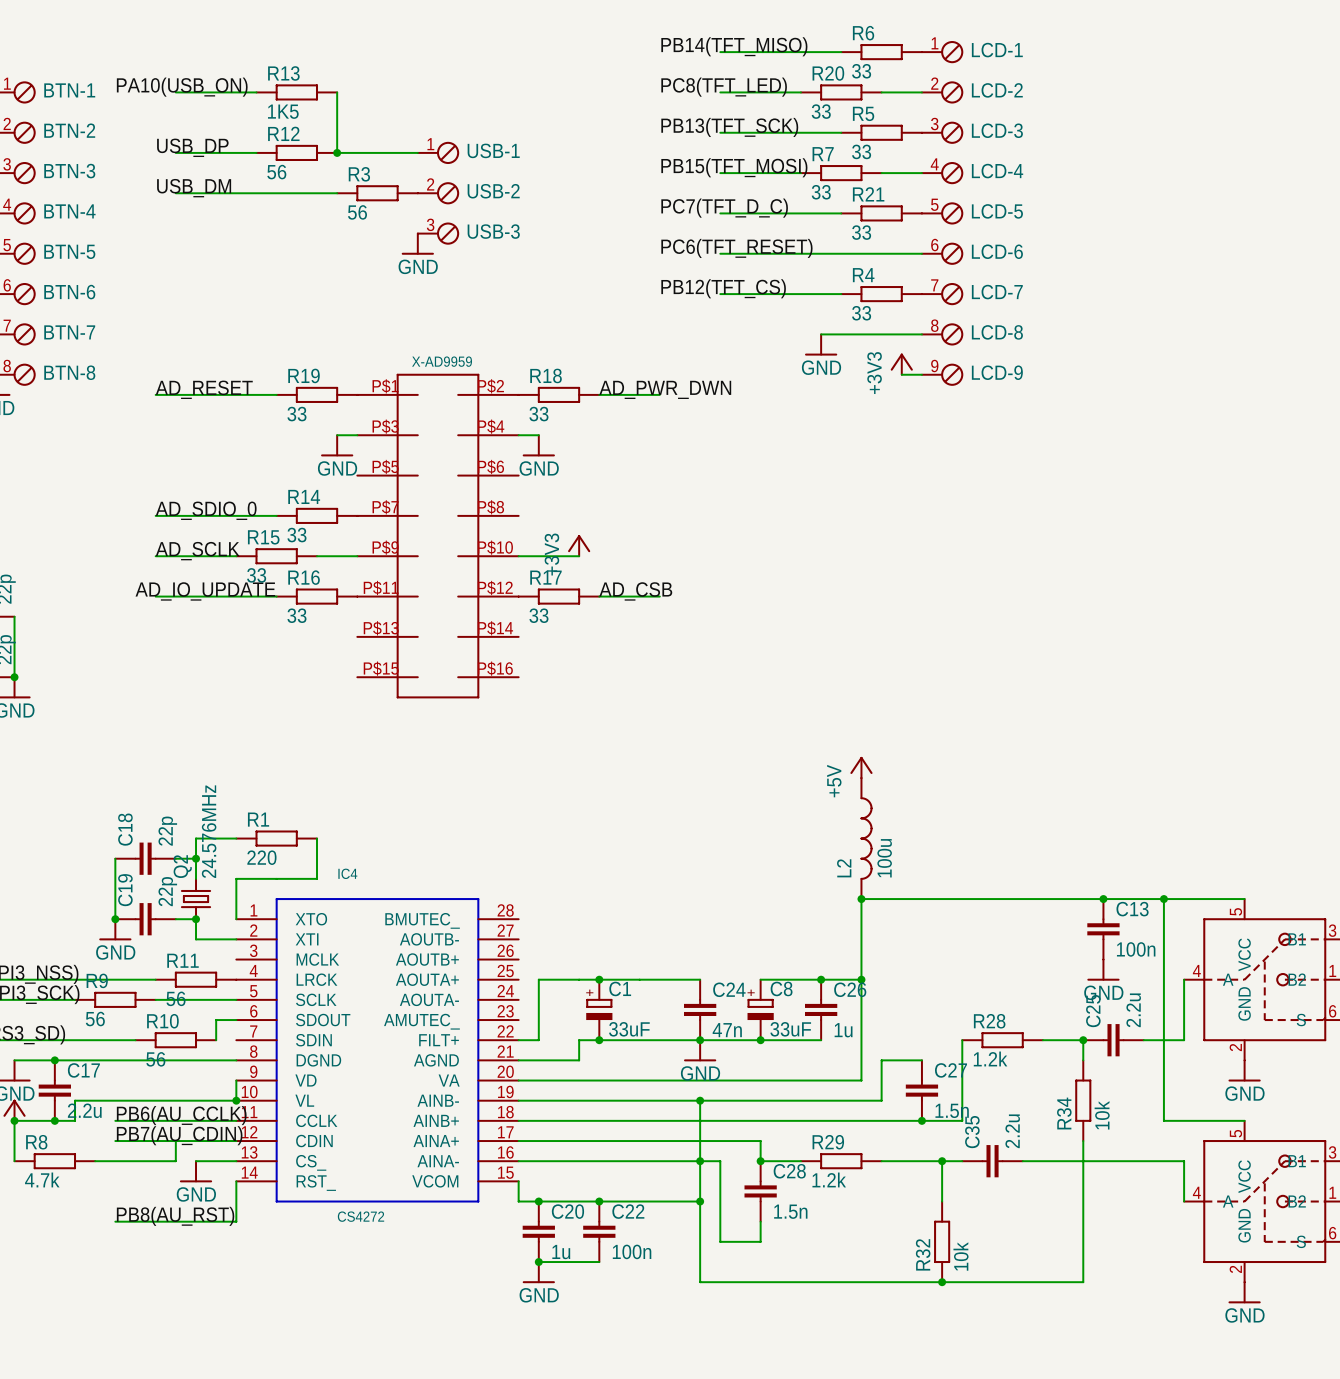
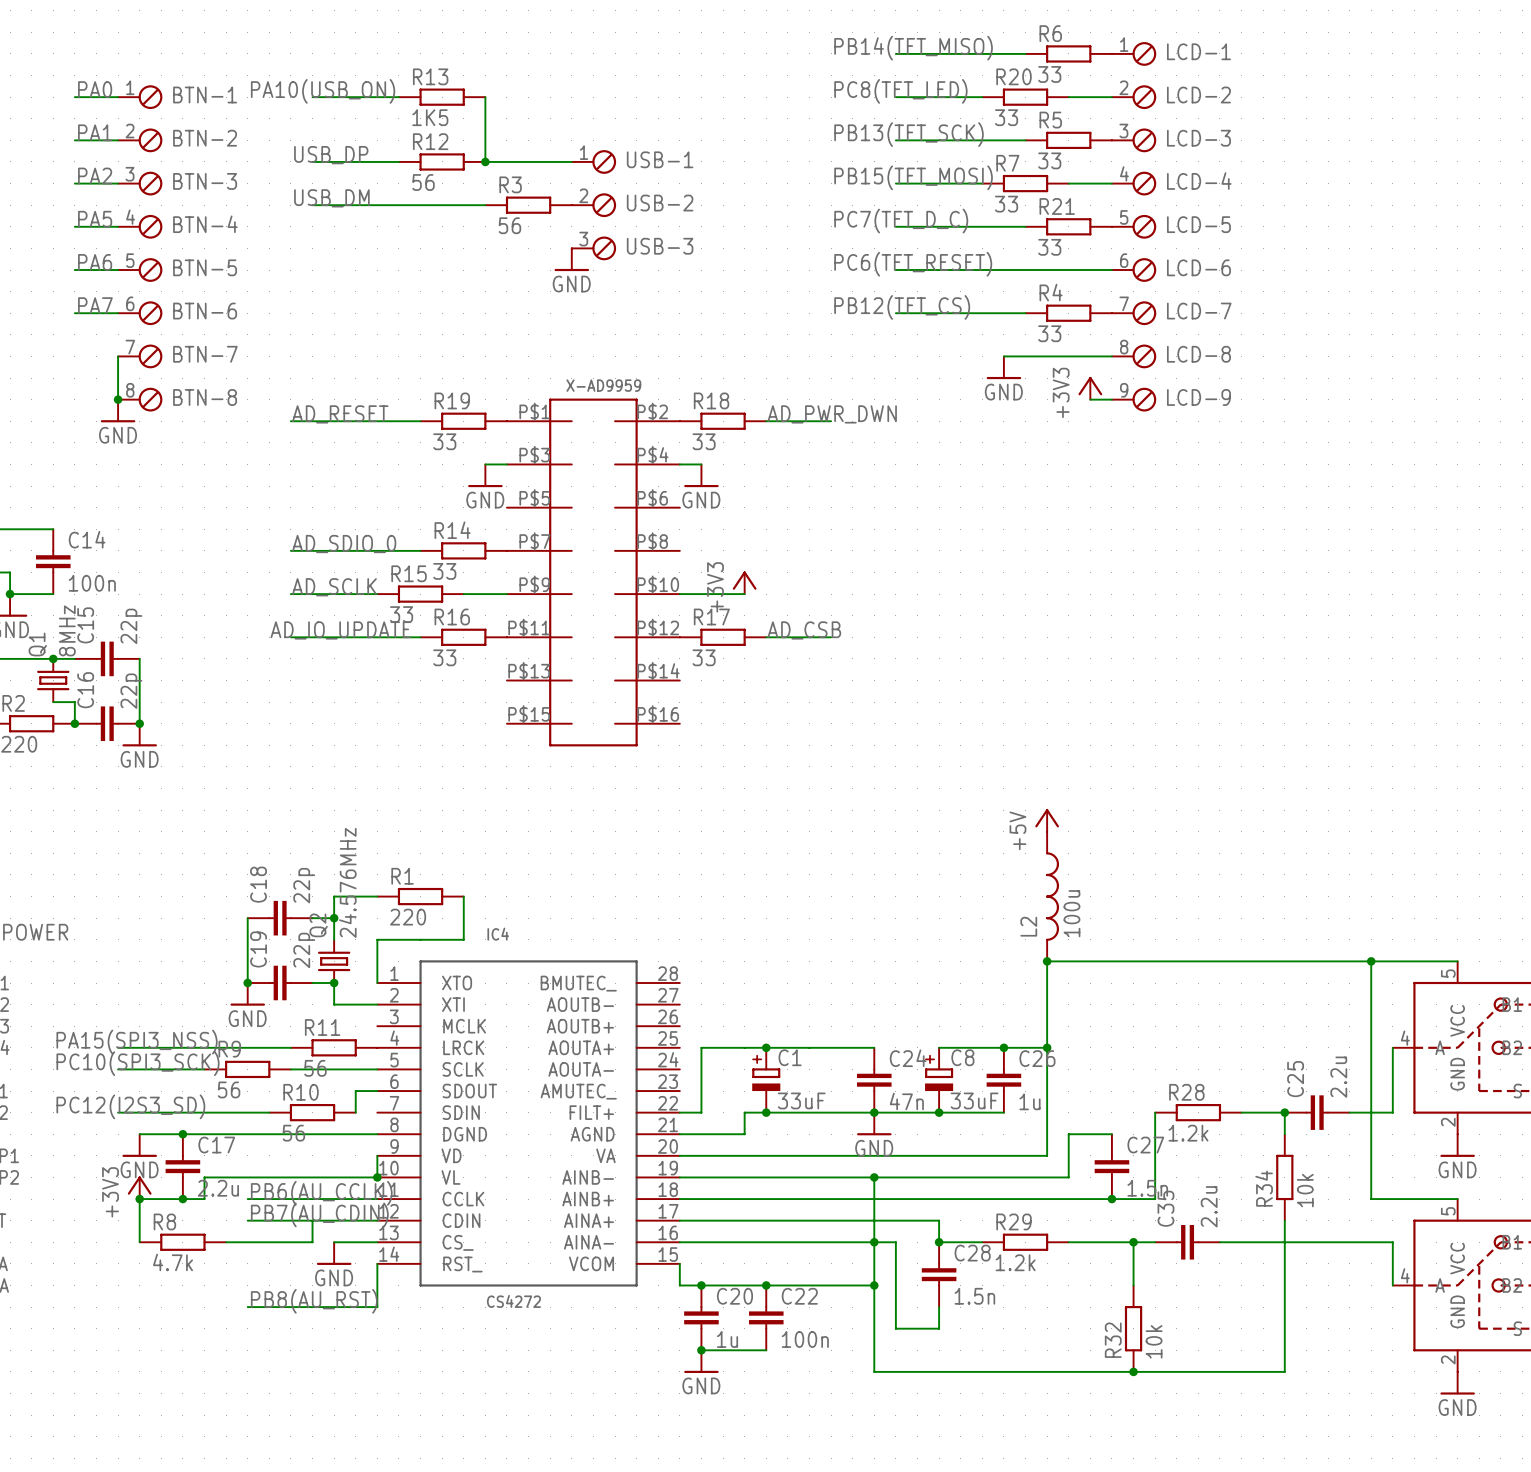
junction: (1103, 899) -> none
C13: 100n (1103, 929) -> none
power symbol: GND (1103, 970) -> none

